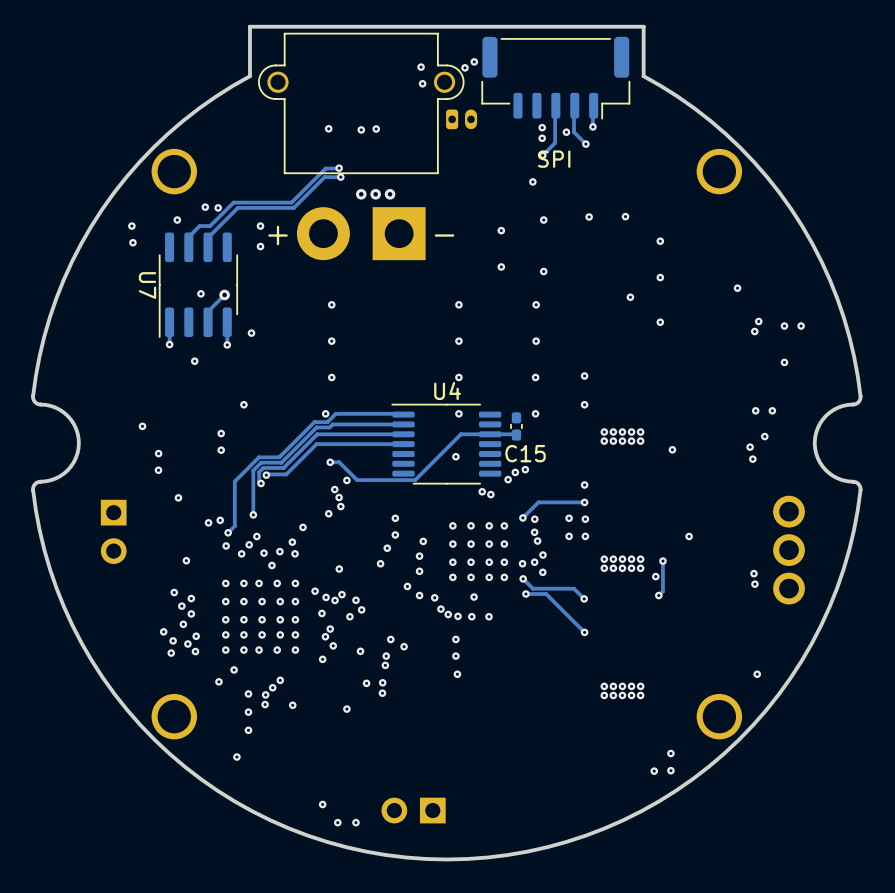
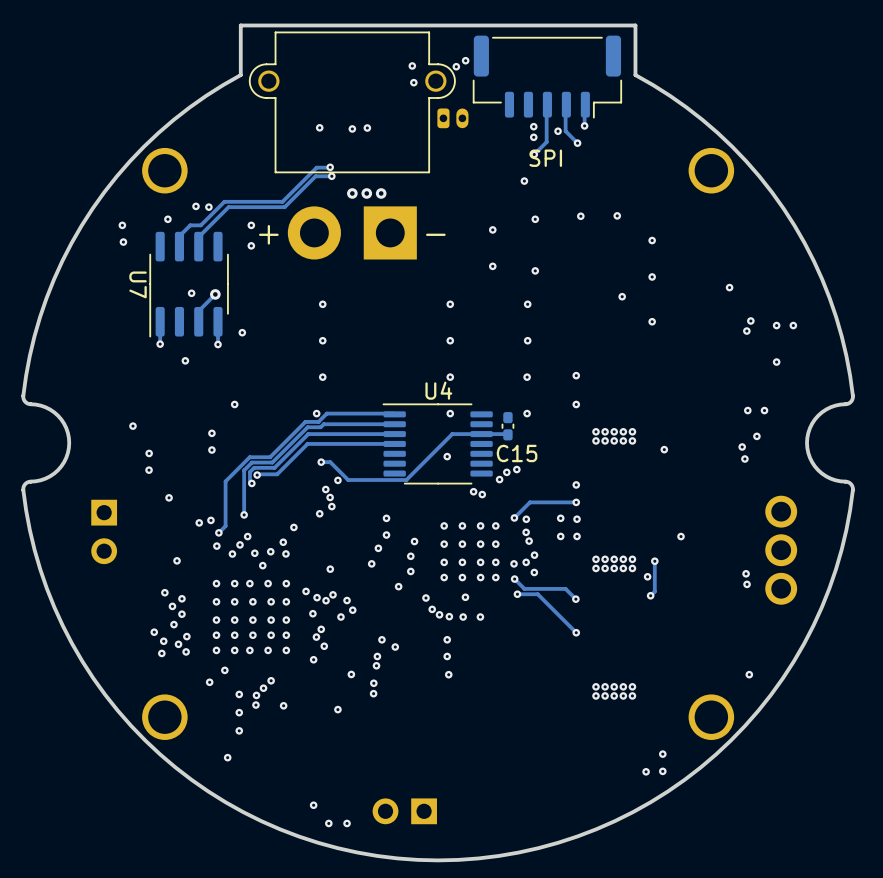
via: (419, 595) -> none
via: (360, 651) -> none
via: none -> (351, 674)
via: (366, 683) -> none

